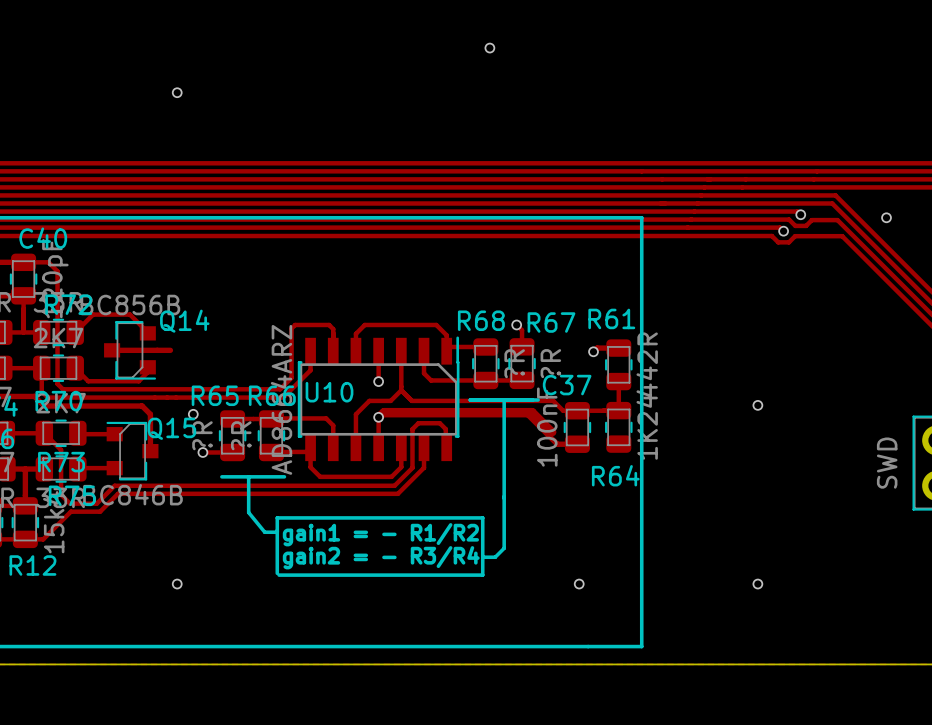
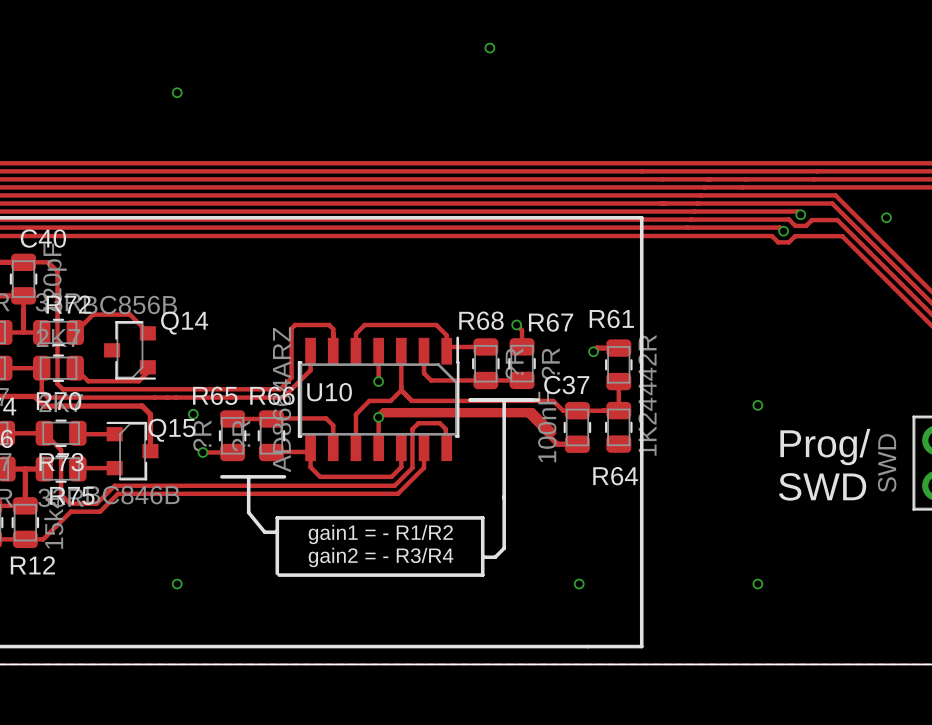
track: (112, 350) (170, 350) -> none
text: none -> Prog/ (825, 447)
text: none -> SWD (822, 486)

